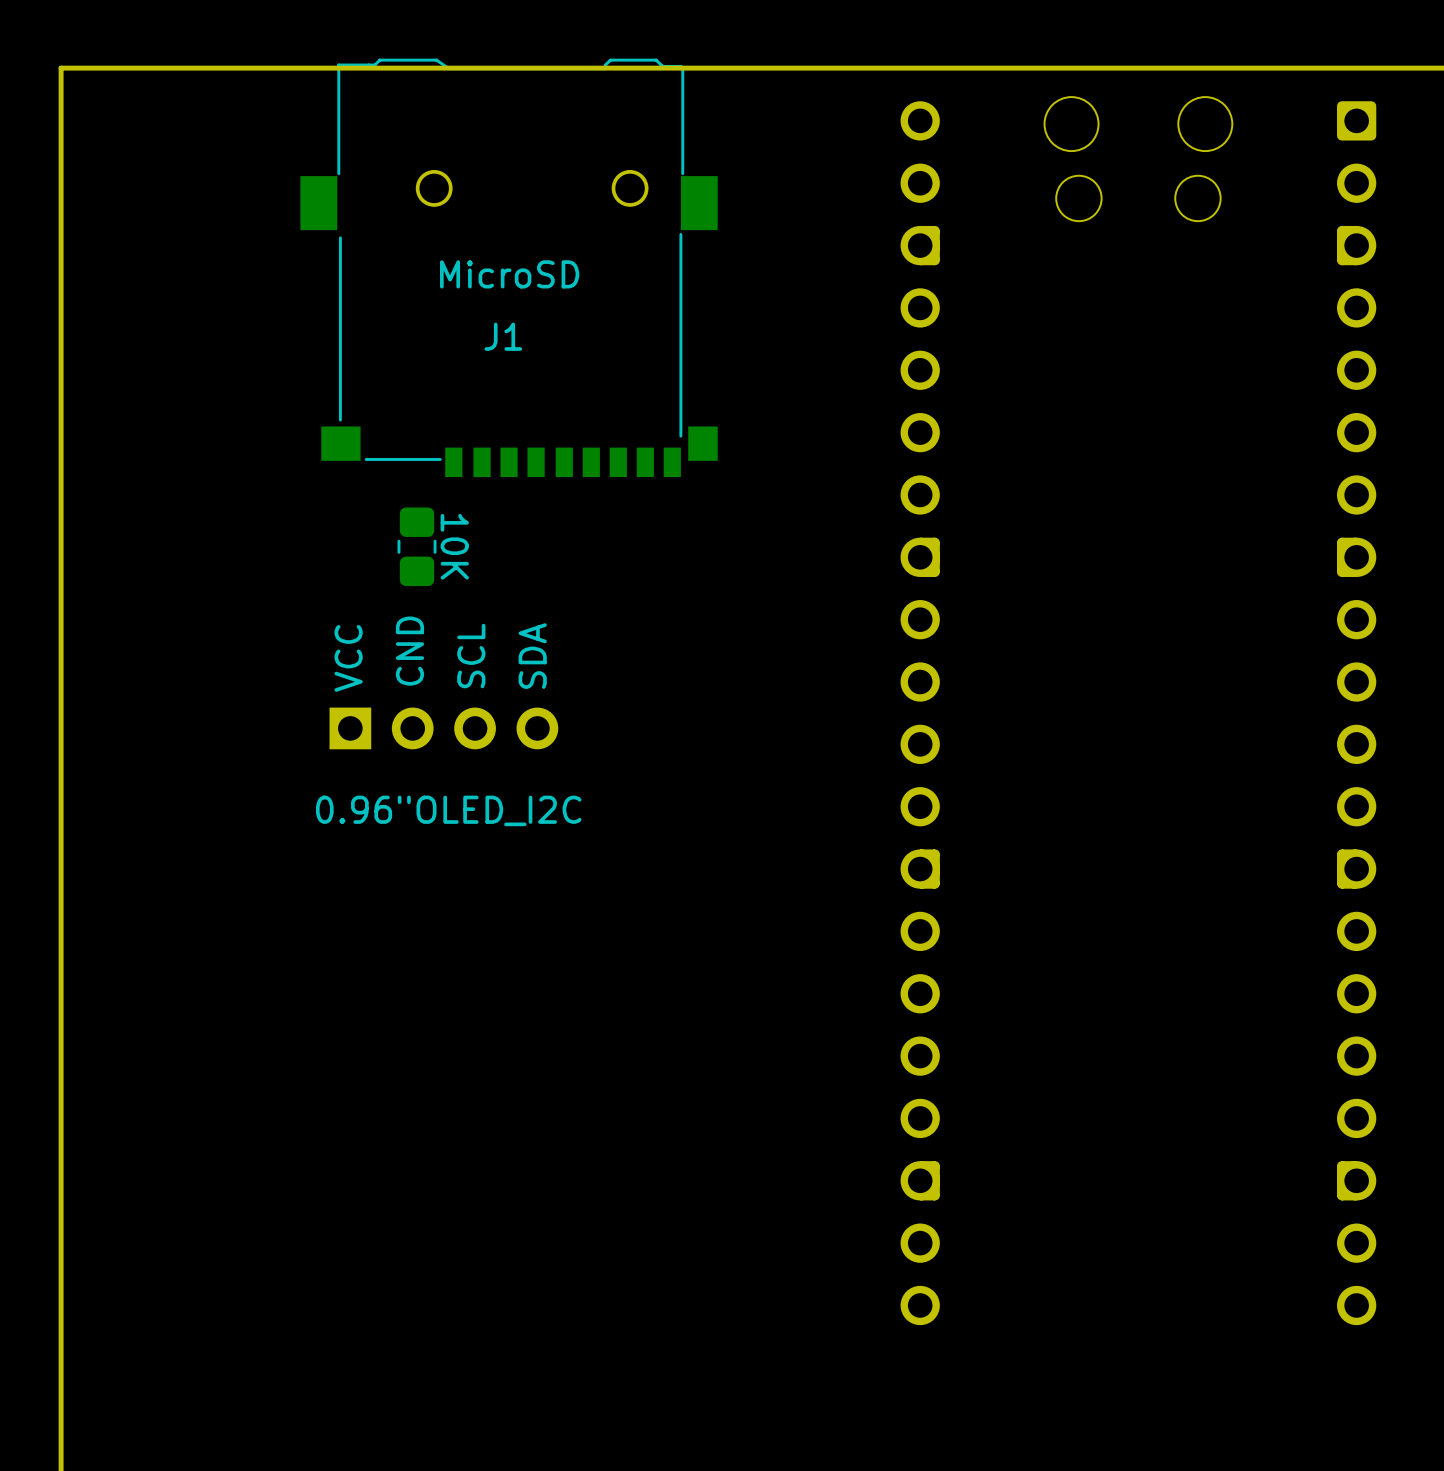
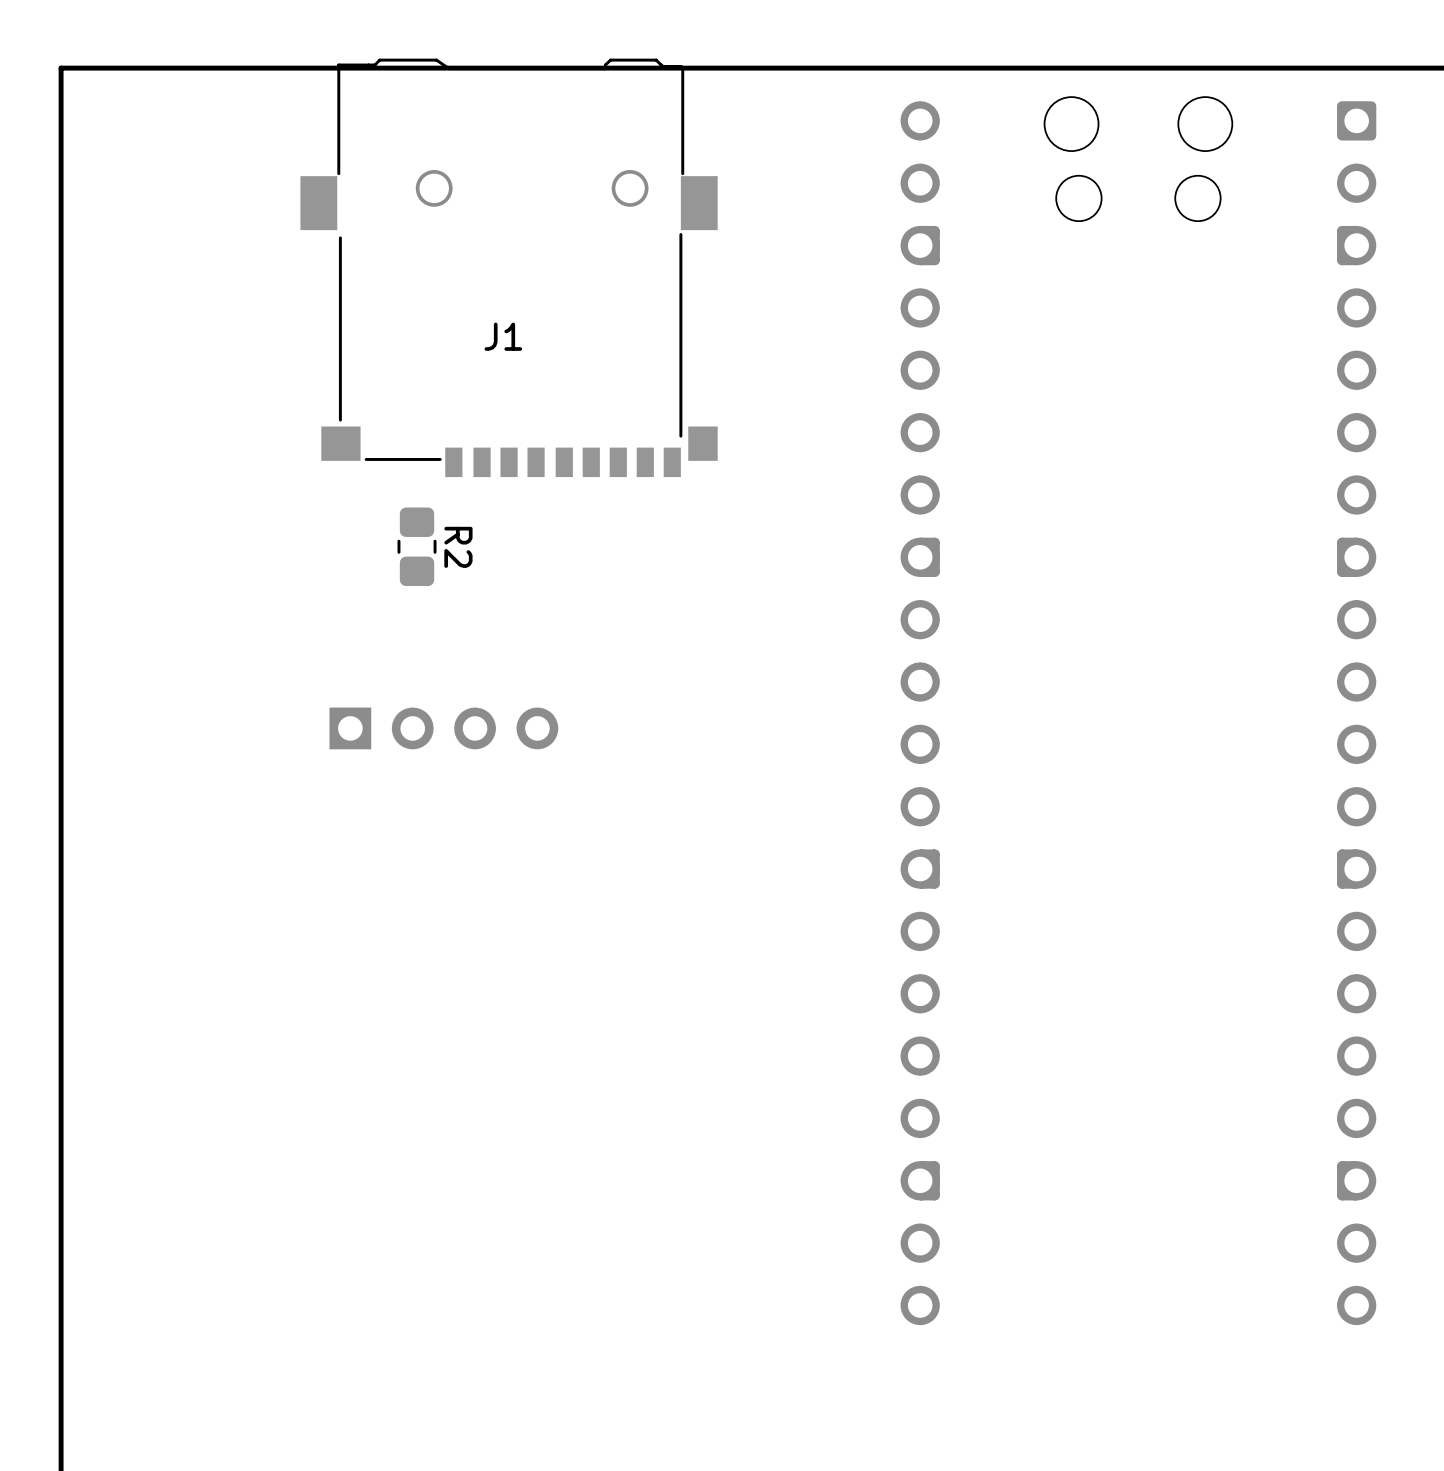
J1 value: MicroSD (509, 274) -> none
R2 value: 10K (454, 546) -> none
R2 name: none -> R2 (458, 547)
text: CND (409, 651) -> none
text: SCL (471, 656) -> none
text: SDA (532, 656) -> none
text: VCC (348, 658) -> none
part value: 0.96"OLED_I2C (448, 810) -> none

